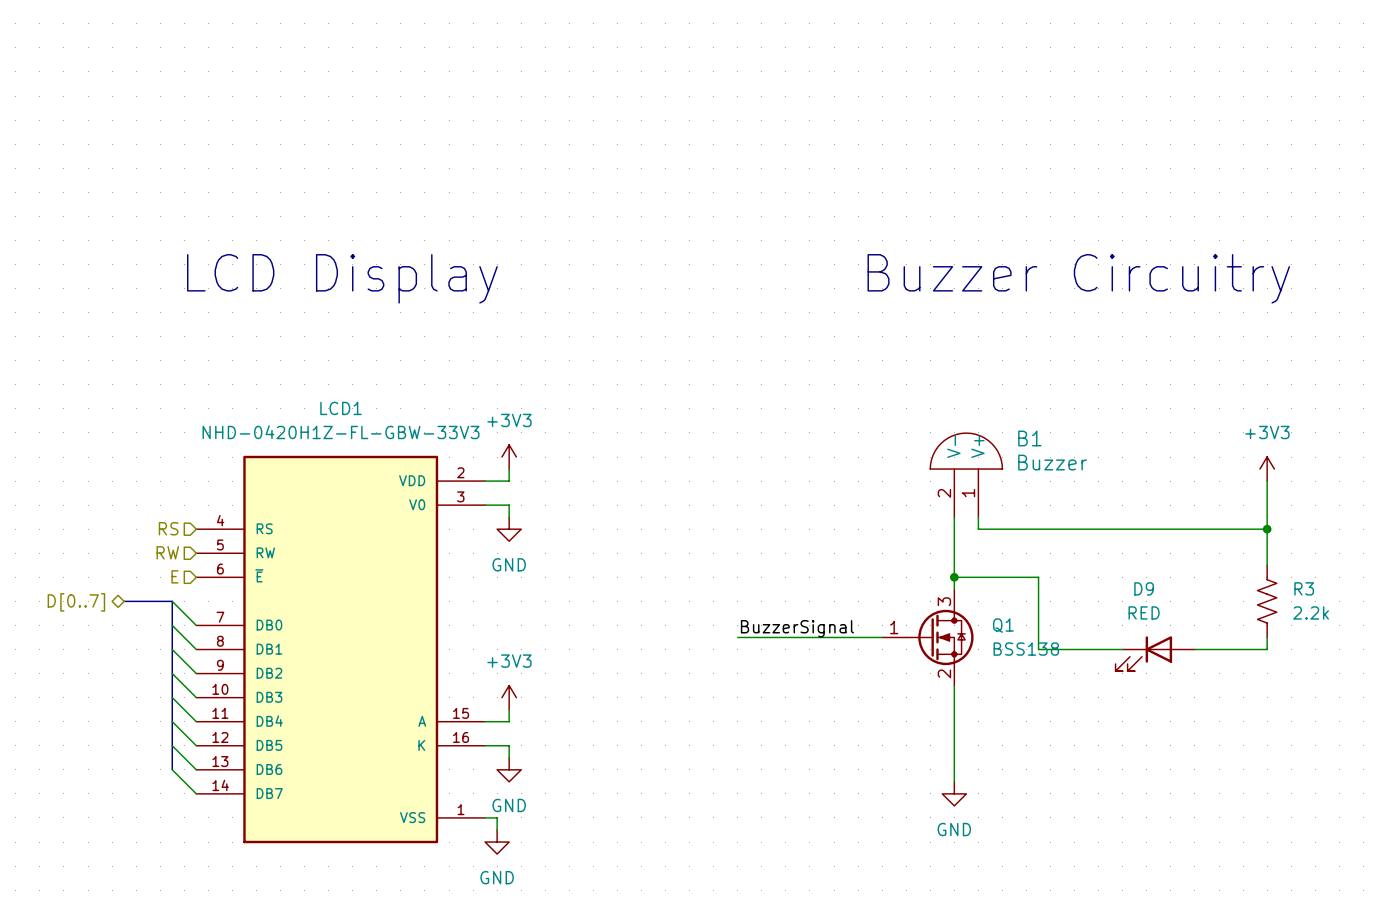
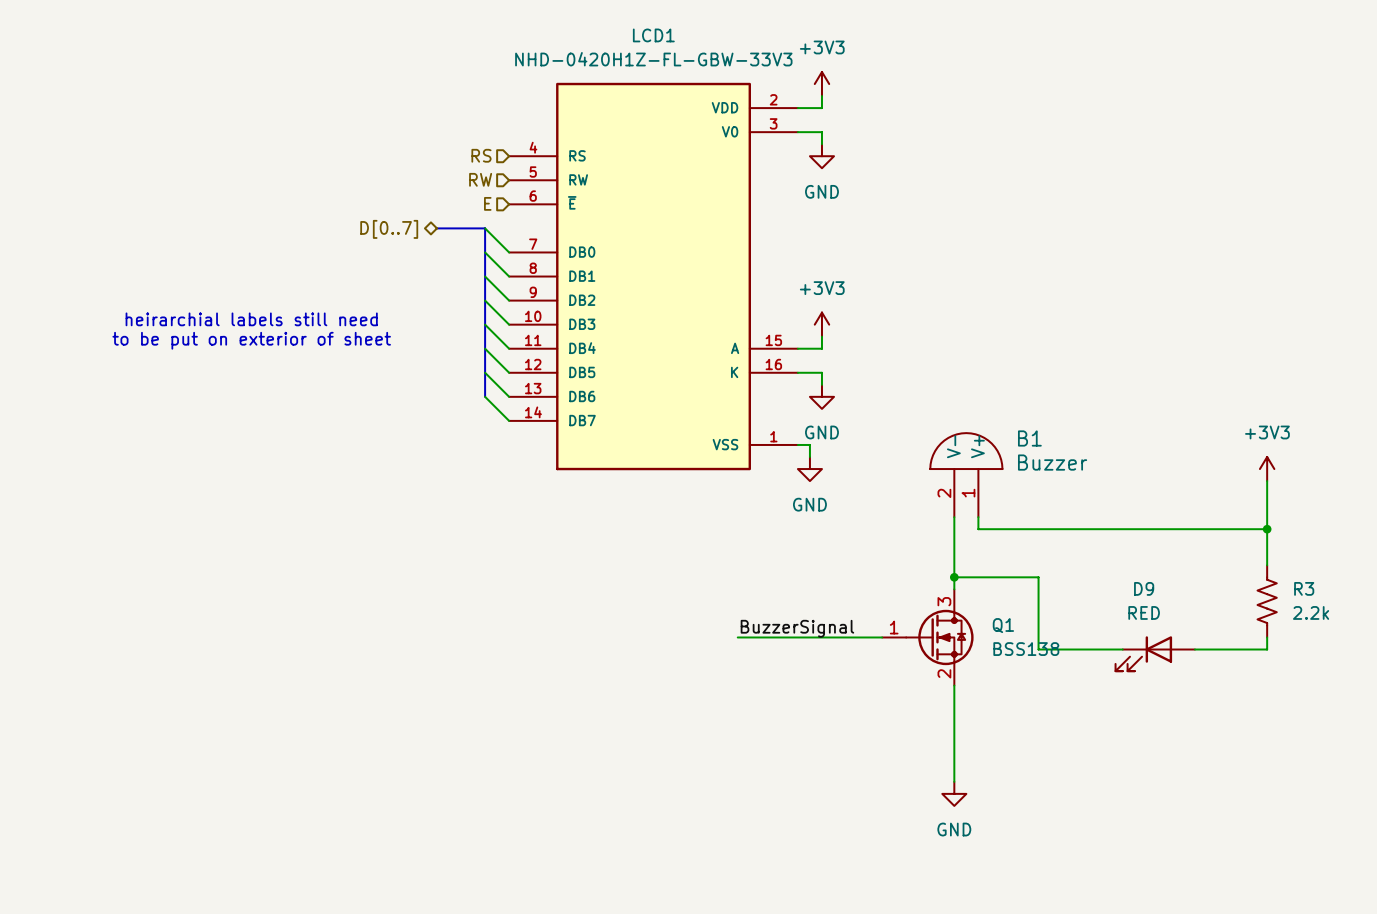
power symbol: none -> +3V3 (821, 84)
wire: none -> (821, 96) (821, 108) (797, 108)
wire: none -> (797, 132) (821, 132) (821, 144)
hierarchical label: none -> RS (481, 155)
power symbol: none -> GND (821, 156)
hierarchical label: none -> RW (480, 179)
hierarchical label: none -> E (487, 203)
bus: none -> (436, 228) (485, 228) (485, 396)
wire: none -> (485, 228) (509, 252)
hierarchical label: none -> D[0..7] (389, 229)
wire: none -> (485, 252) (509, 276)
wire: none -> (485, 276) (509, 300)
text: LCD Display (342, 278) -> none
text: Buzzer Circuitry (1078, 278) -> none
wire: none -> (485, 300) (509, 324)
text: none -> heirarchial labels still need (251, 319)
wire: none -> (485, 324) (509, 348)
power symbol: none -> +3V3 (821, 324)
wire: none -> (821, 336) (821, 348) (797, 348)
text: none -> to be put on exterior of sheet (251, 340)
wire: none -> (485, 348) (509, 372)
wire: none -> (485, 372) (509, 396)
wire: none -> (797, 372) (821, 372) (821, 384)
wire: none -> (485, 396) (509, 420)
power symbol: none -> GND (821, 396)
wire: none -> (797, 444) (809, 444) (809, 457)
power symbol: +3V3 (509, 457) -> none
wire: (509, 469) (509, 481) (485, 481) -> none
power symbol: none -> GND (809, 469)
wire: (485, 505) (509, 505) (509, 517) -> none
hierarchical label: RS (168, 528) -> none
power symbol: GND (509, 529) -> none
hierarchical label: RW (167, 552) -> none
hierarchical label: E (174, 576) -> none
bus: (124, 601) (172, 601) (172, 769) -> none
wire: (172, 601) (196, 625) -> none
hierarchical label: D[0..7] (76, 602) -> none
wire: (172, 625) (196, 649) -> none
wire: (172, 649) (196, 673) -> none
LCD1 position: (340, 649) -> (653, 276)
wire: (172, 673) (196, 697) -> none
wire: (172, 697) (196, 721) -> none
power symbol: +3V3 (509, 697) -> none
wire: (509, 709) (509, 721) (485, 721) -> none
wire: (172, 721) (196, 745) -> none
wire: (172, 745) (196, 769) -> none
wire: (485, 745) (509, 745) (509, 757) -> none
wire: (172, 769) (196, 793) -> none
power symbol: GND (509, 769) -> none
wire: (485, 817) (497, 817) (497, 829) -> none
power symbol: GND (497, 842) -> none

